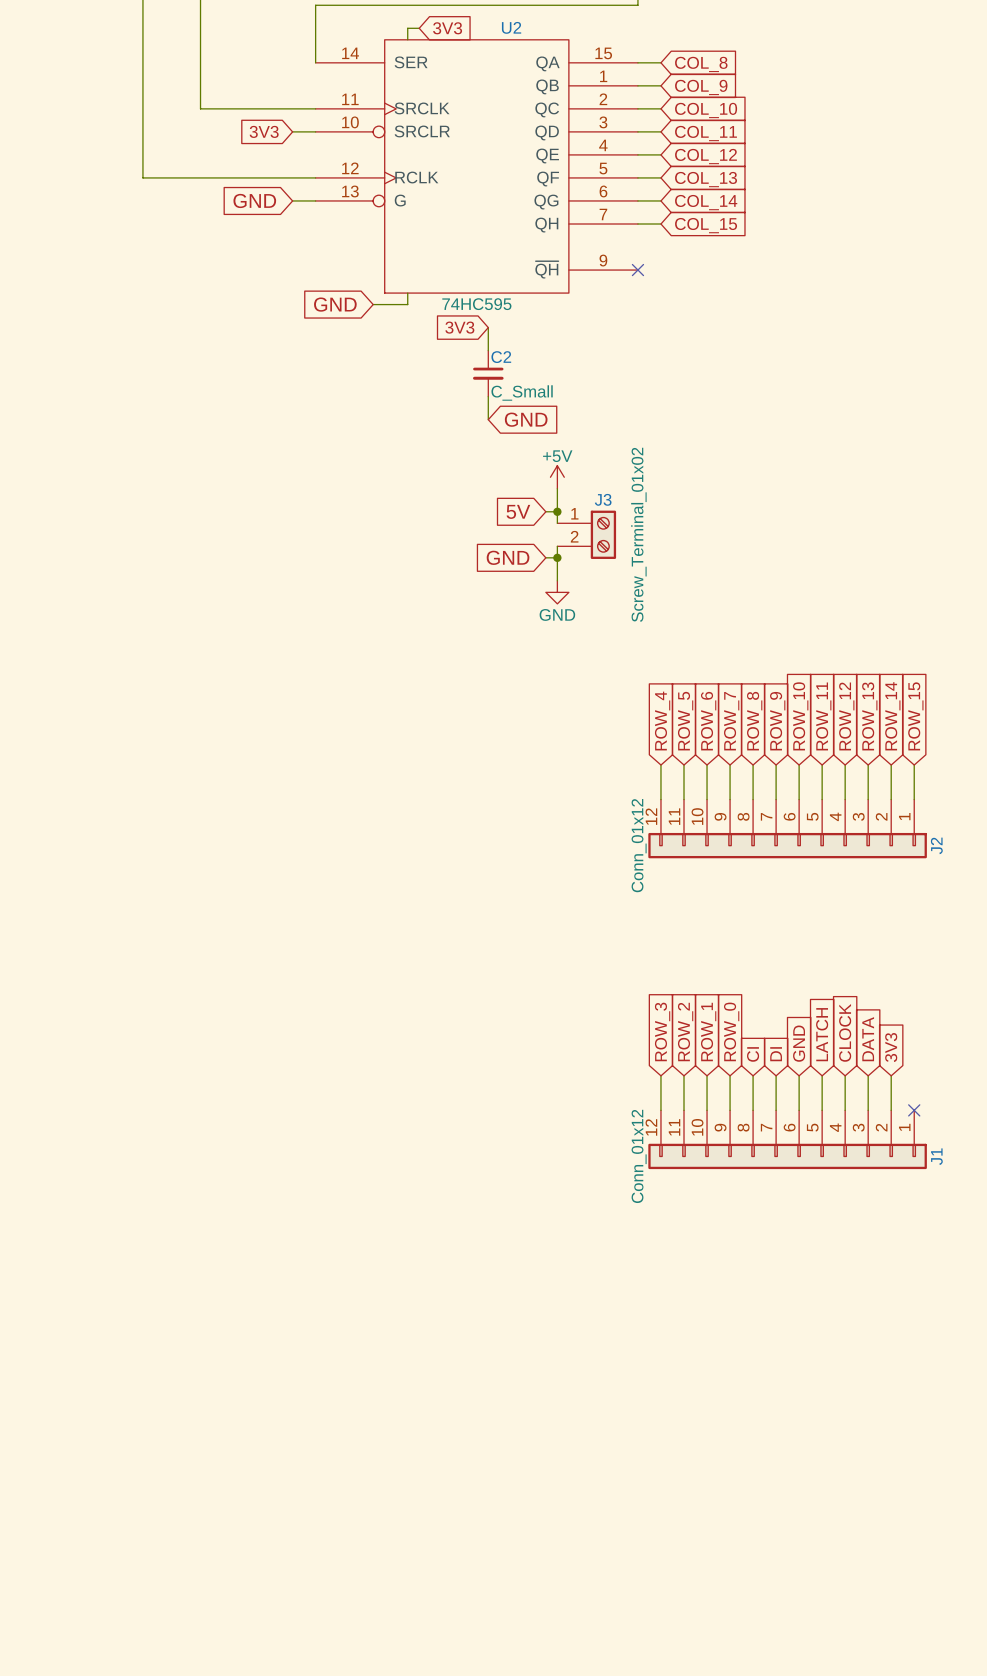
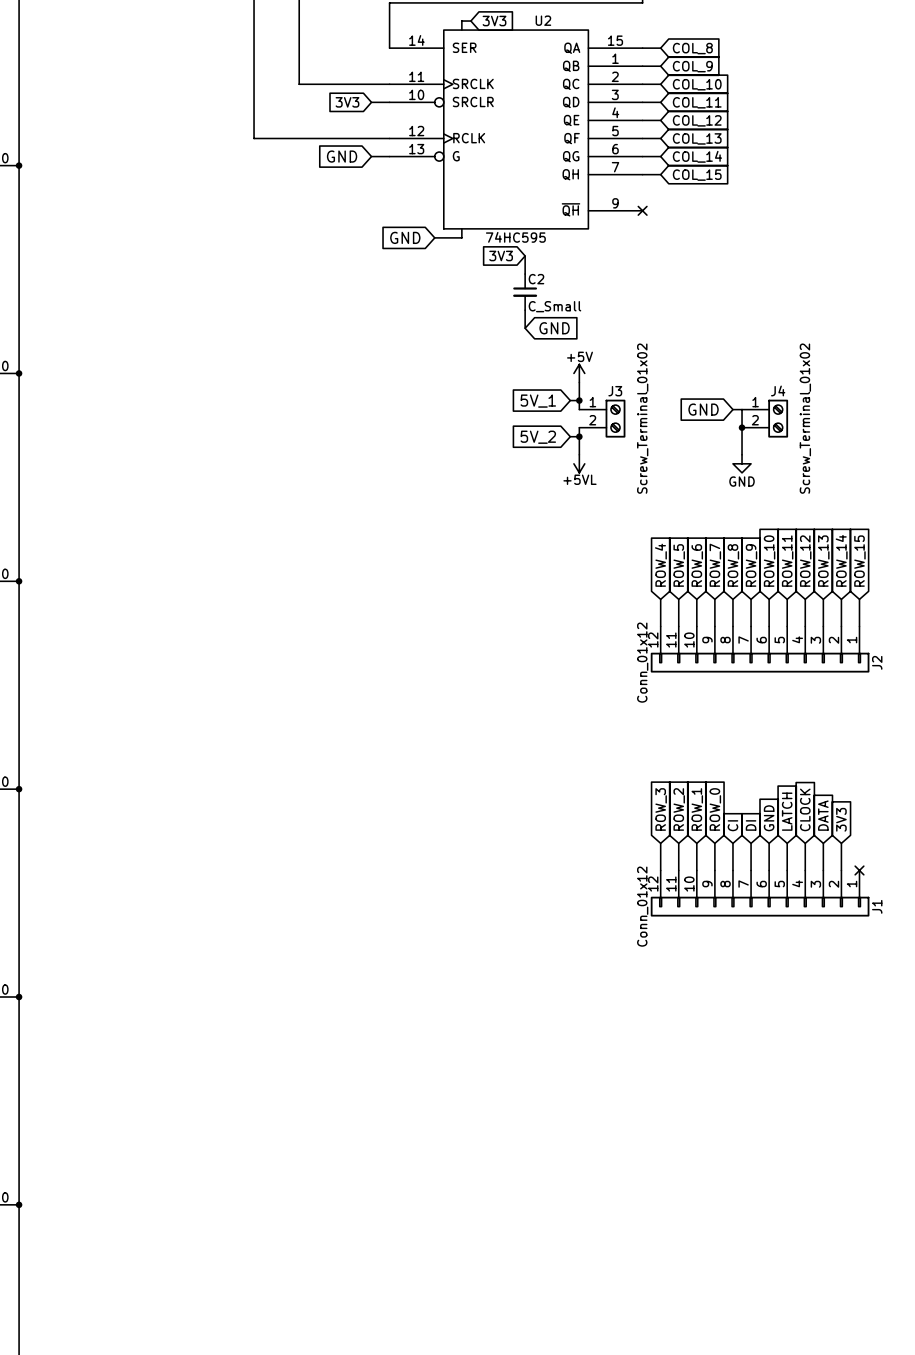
global label: 5V (518, 511) -> 5V_1 (538, 401)
global label: none -> GND (703, 409)
wire: none -> (732, 409) (742, 409) (742, 454)
J4: none -> Screw_Terminal_01x02 (765, 418)
junction: none -> (742, 427)
global label: GND (508, 557) -> 5V_2 (538, 437)
power symbol: GND (557, 592) -> +5VL (579, 463)
power symbol: none -> GND (742, 463)

